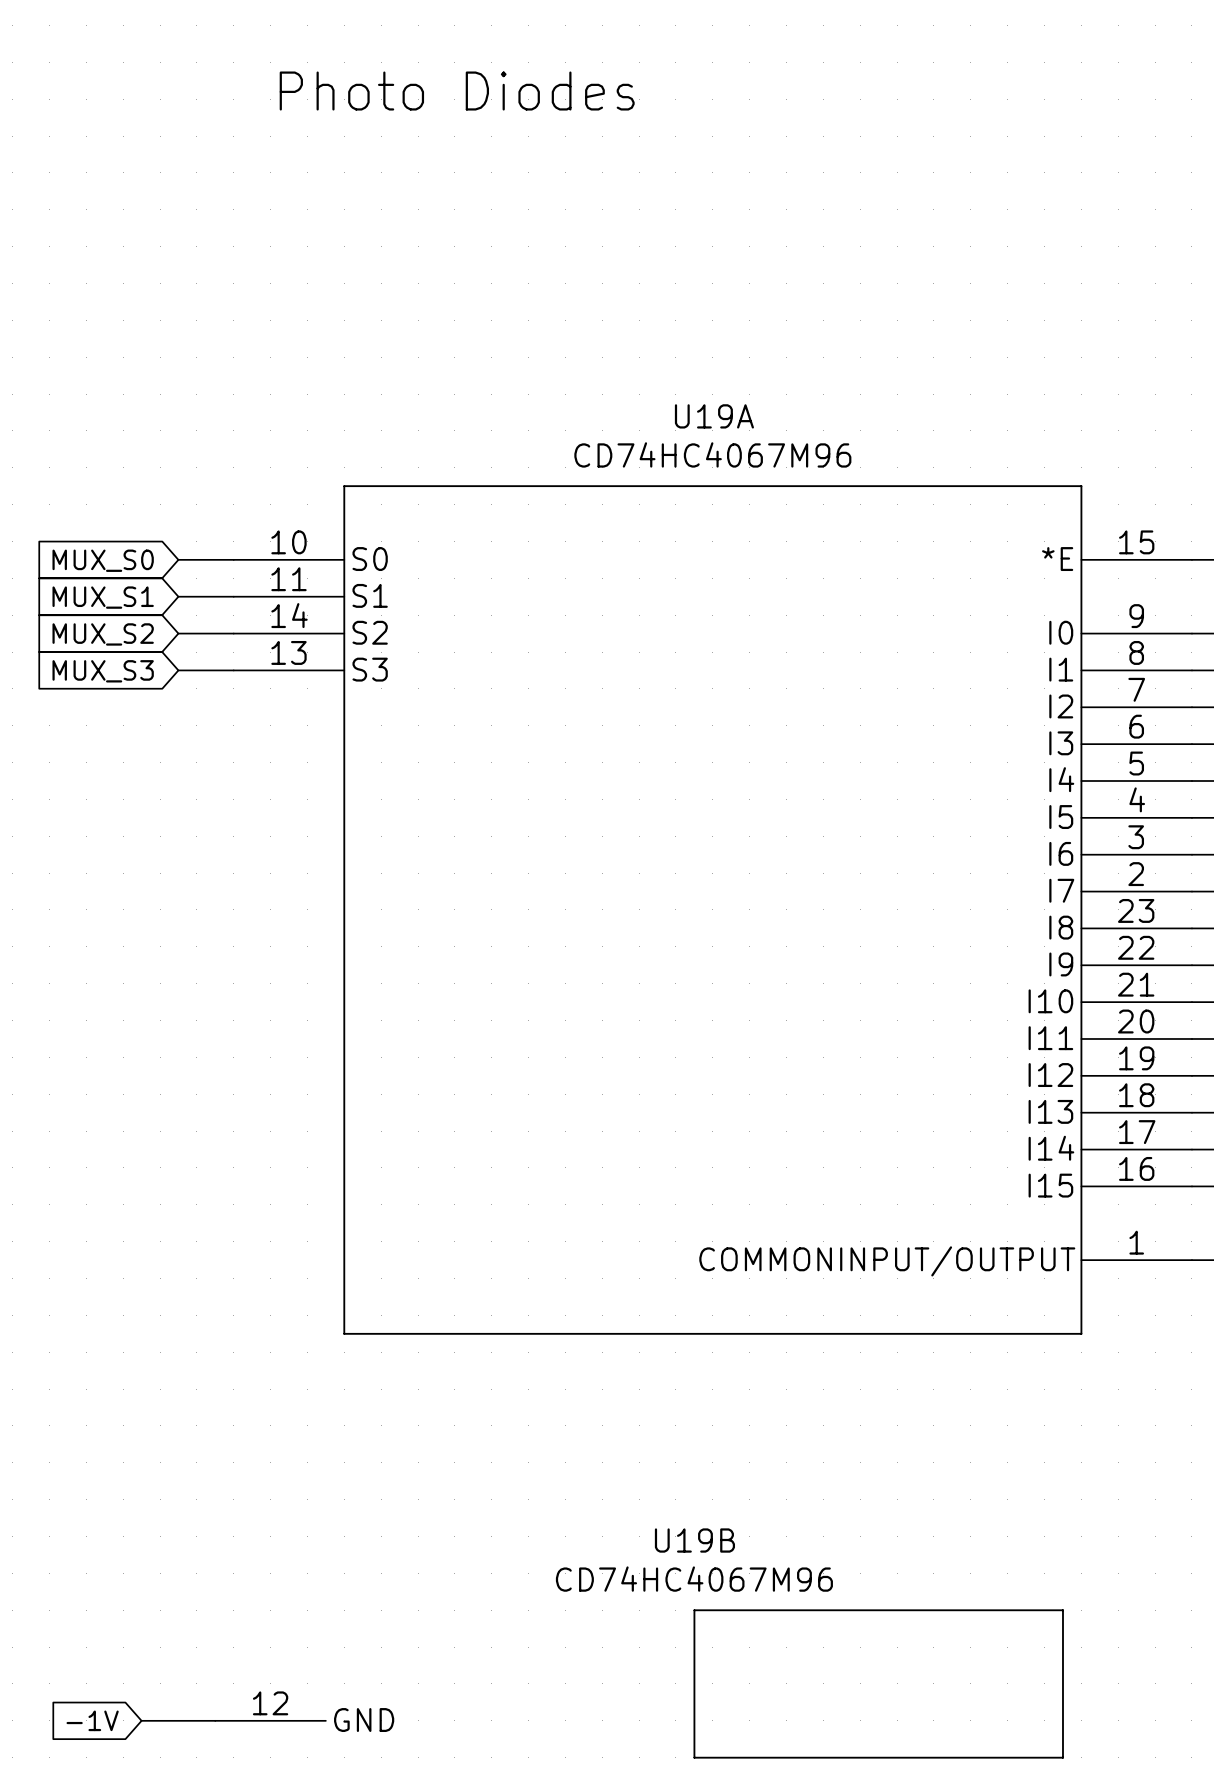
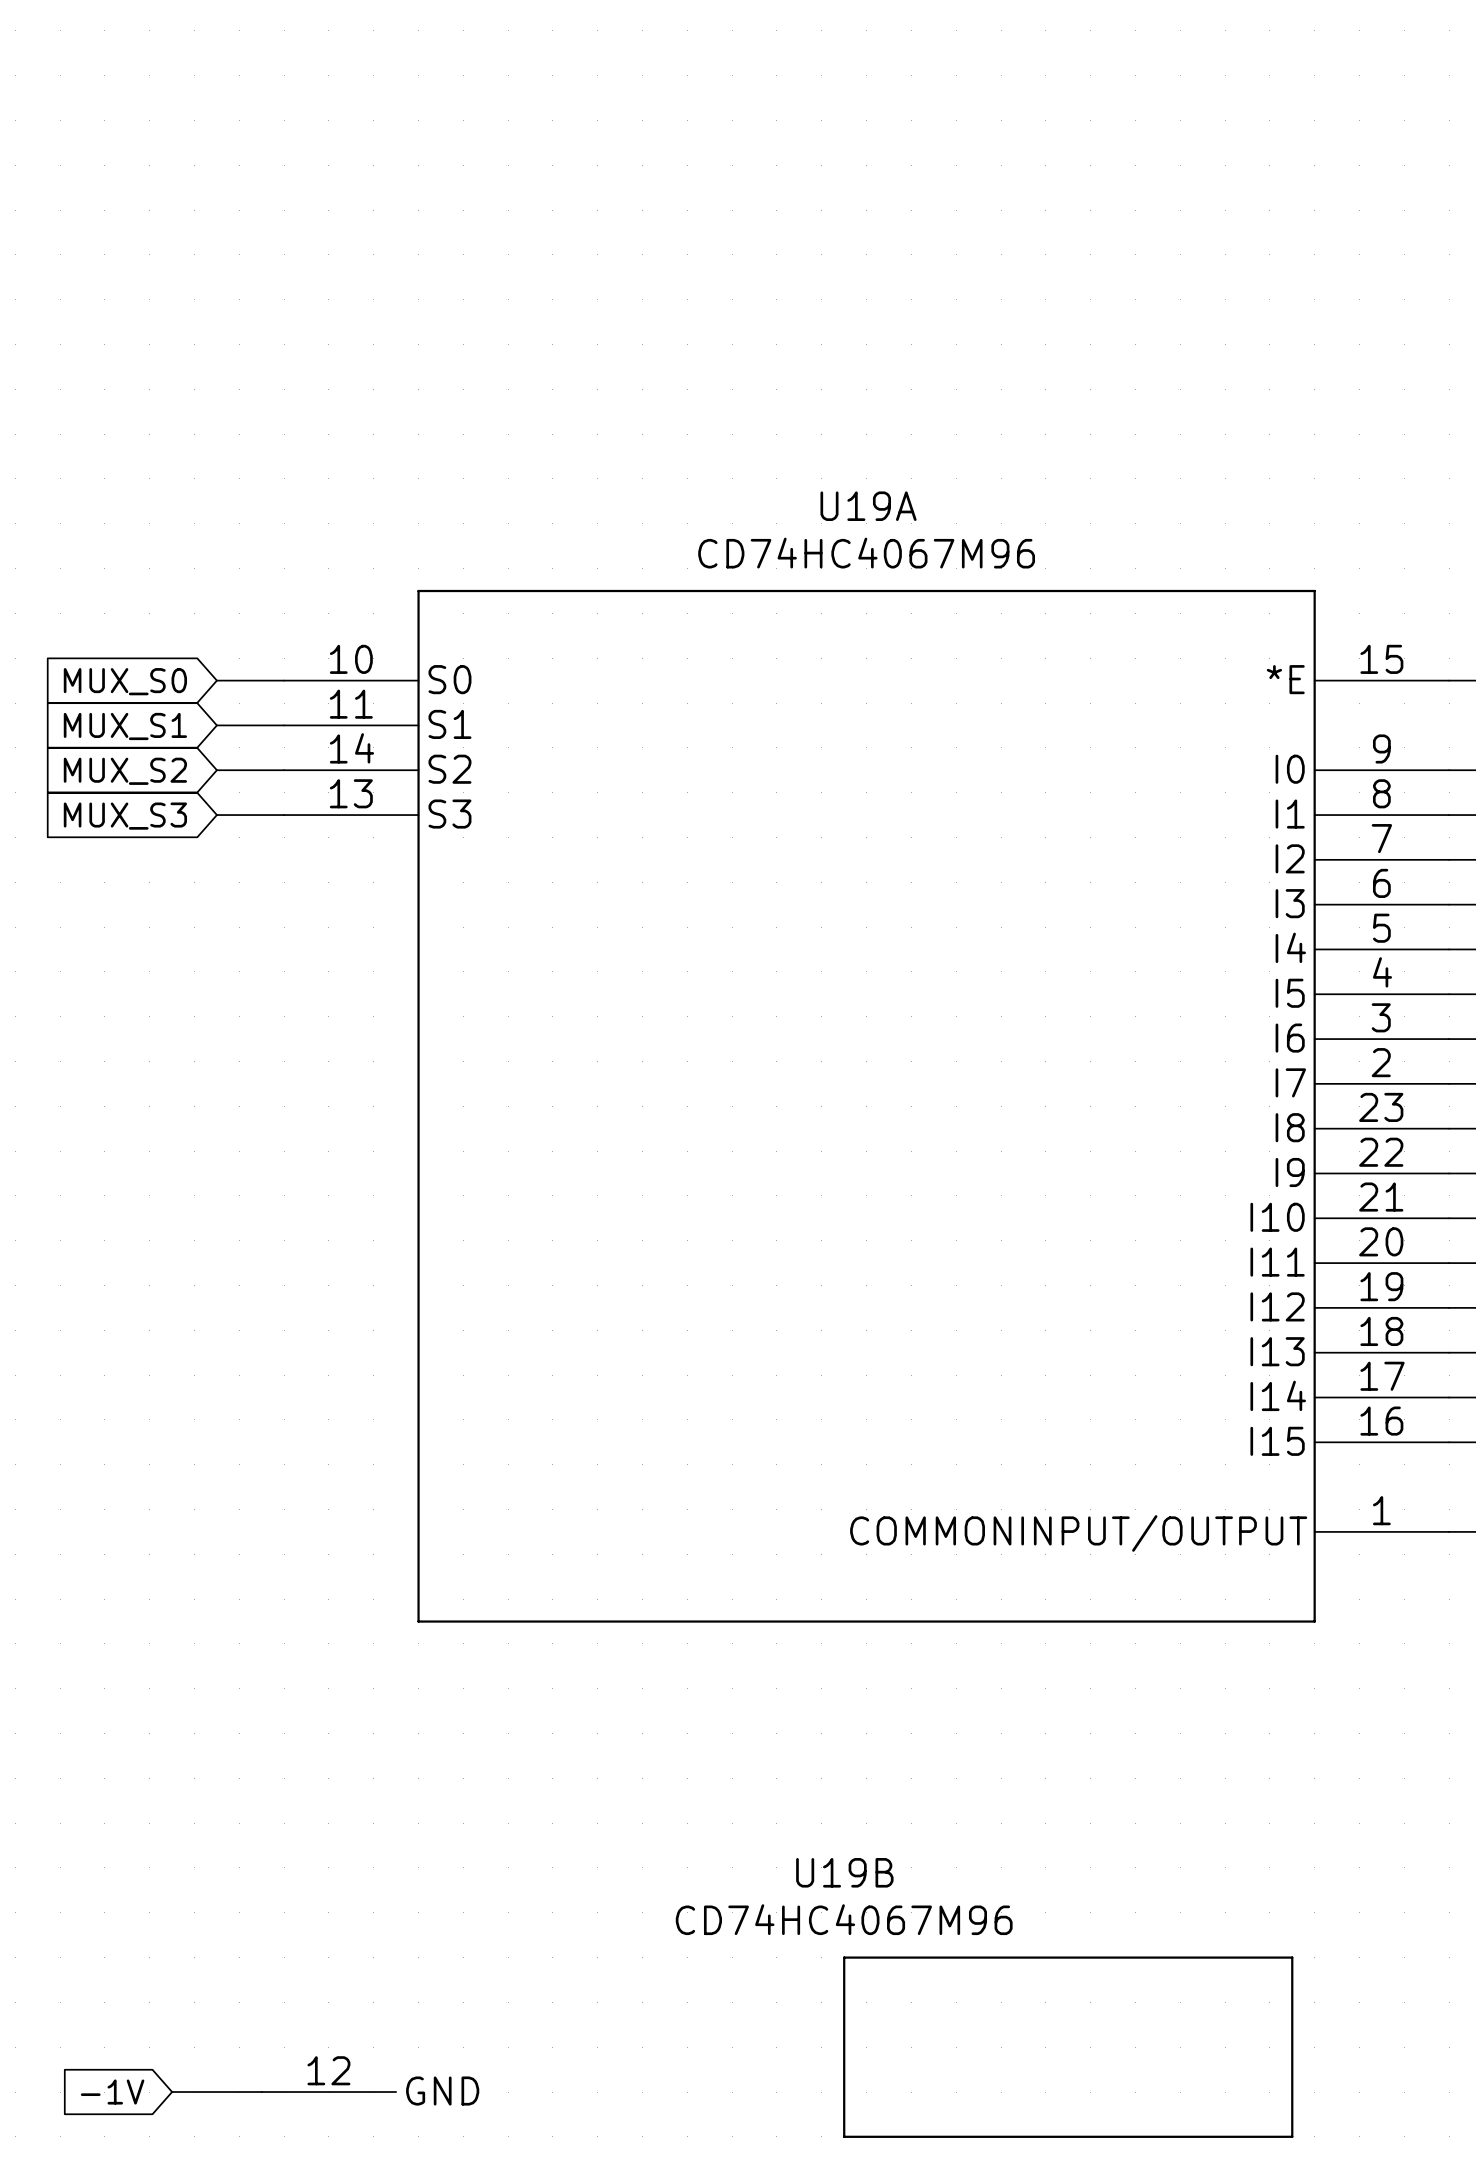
text: Photo Diodes (457, 91) -> none

